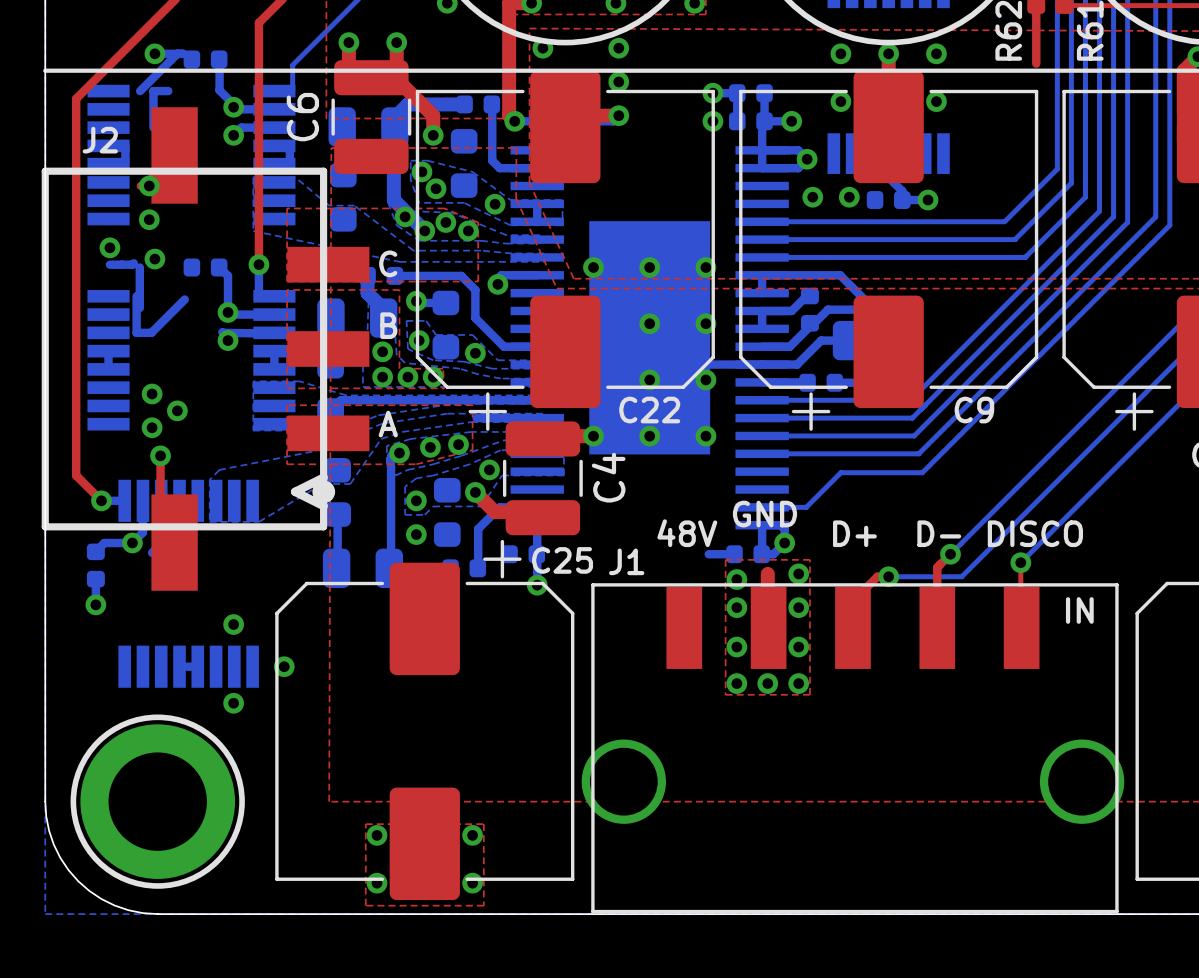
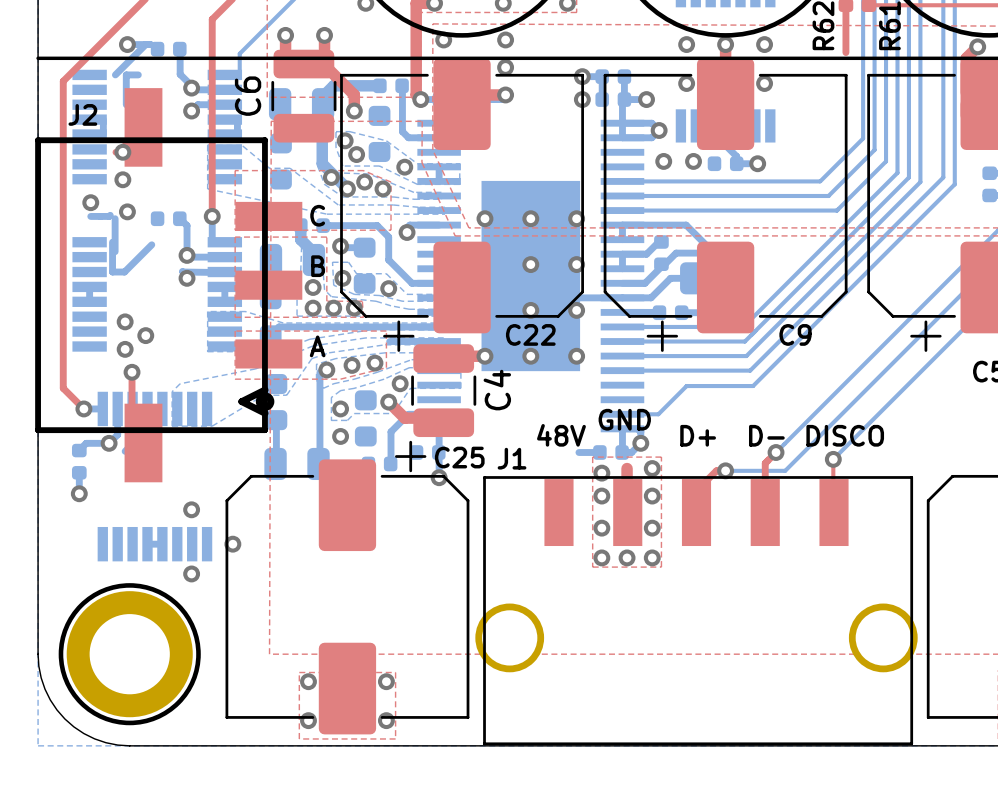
text: IN (1079, 610) -> none

